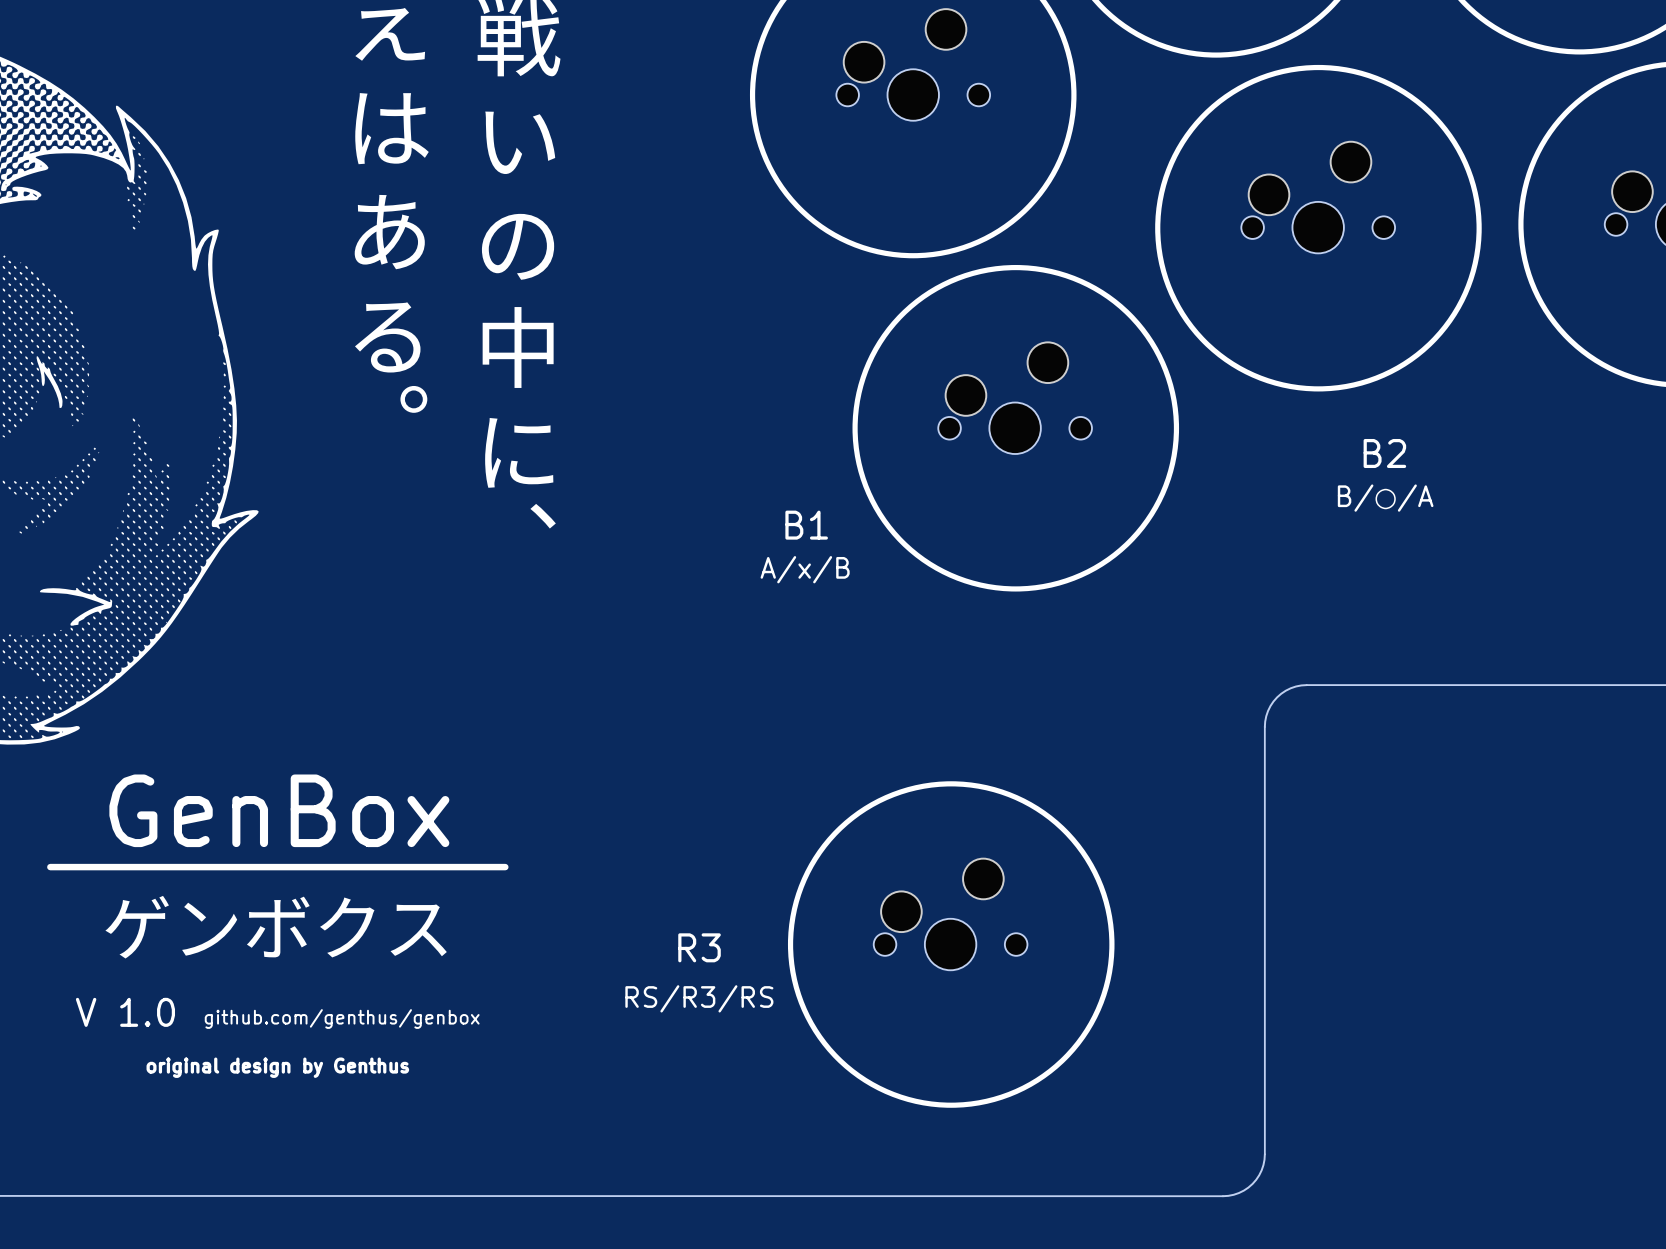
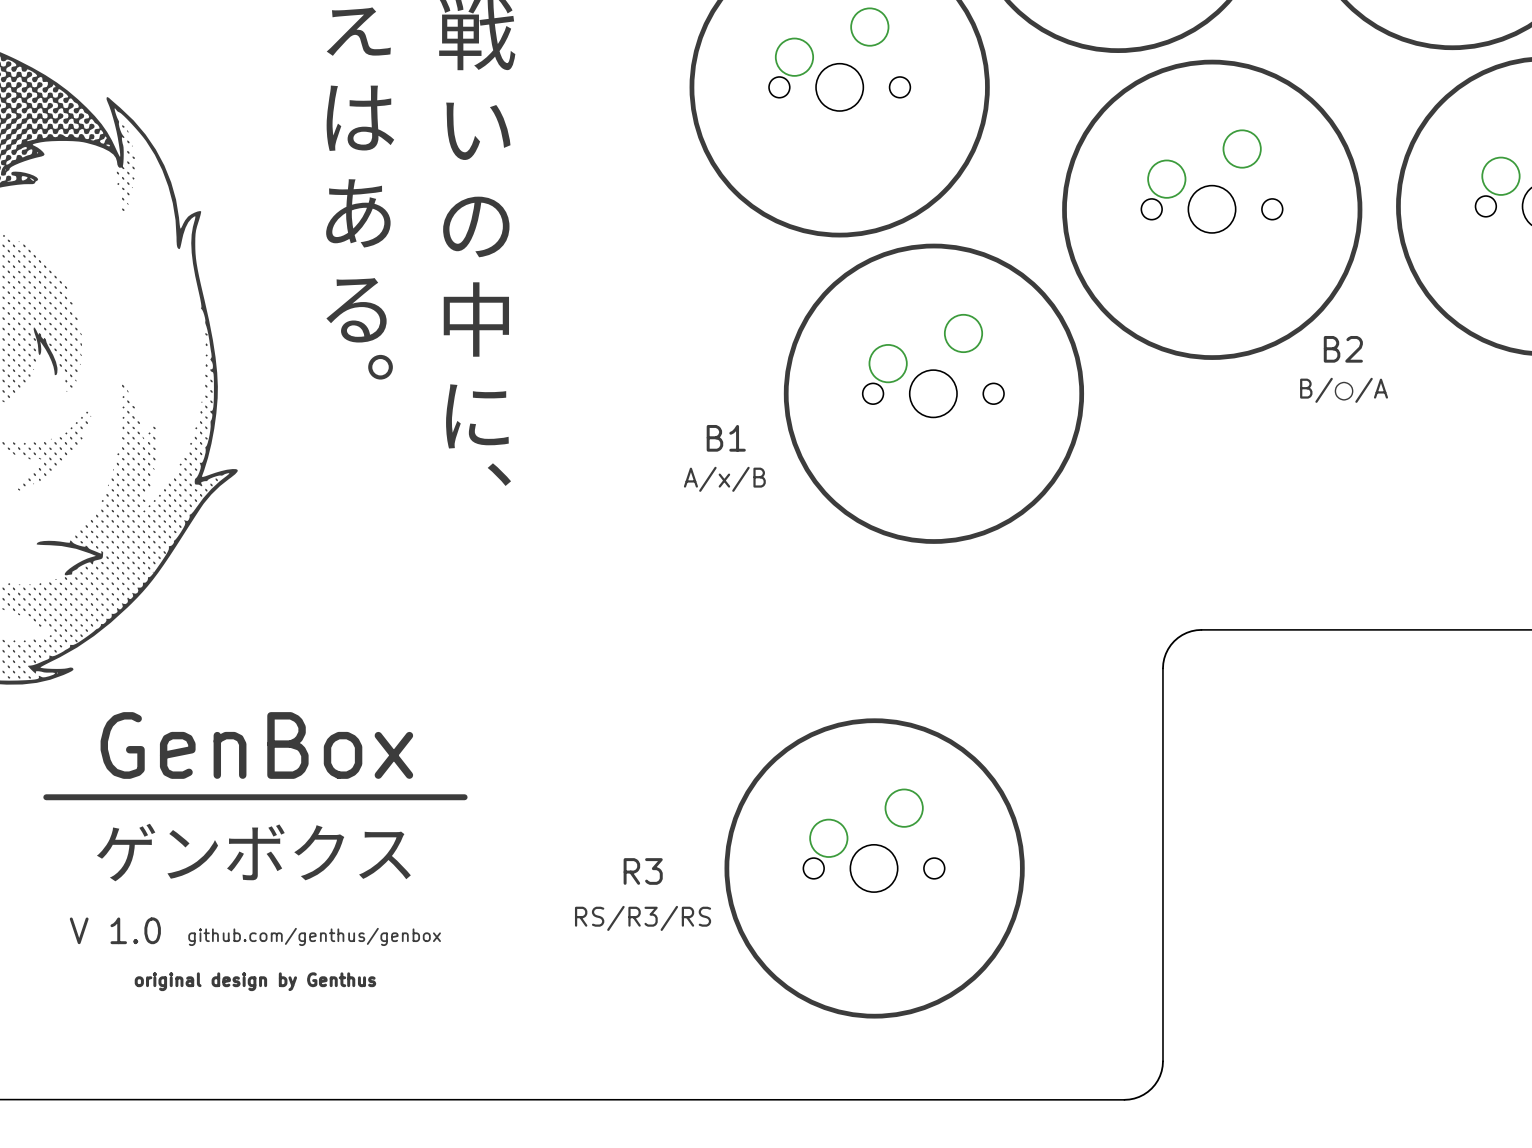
text position: B2 (1384, 453) -> B2 (1343, 349)
text position: B/○/A (1385, 498) -> B/○/A (1344, 390)
text position: B1 (806, 525) -> B1 (726, 438)
text position: A/x/B (805, 569) -> A/x/B (724, 479)

